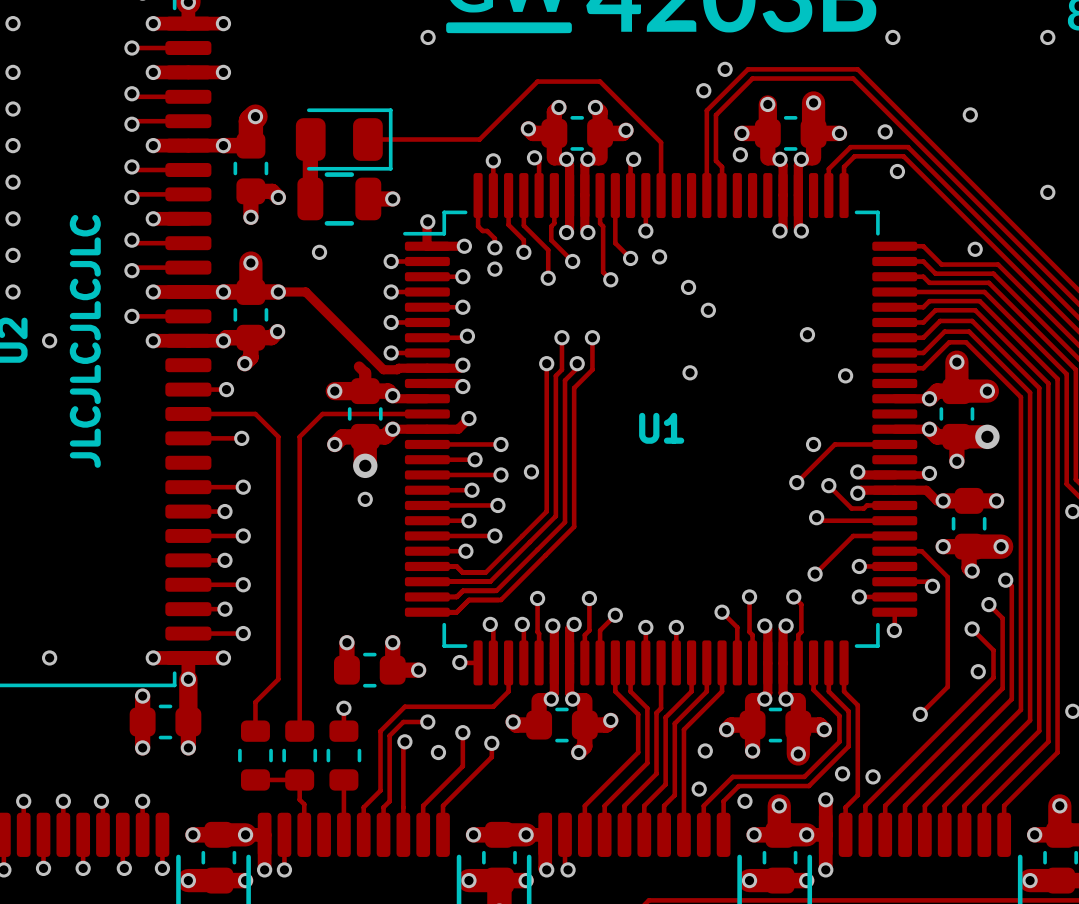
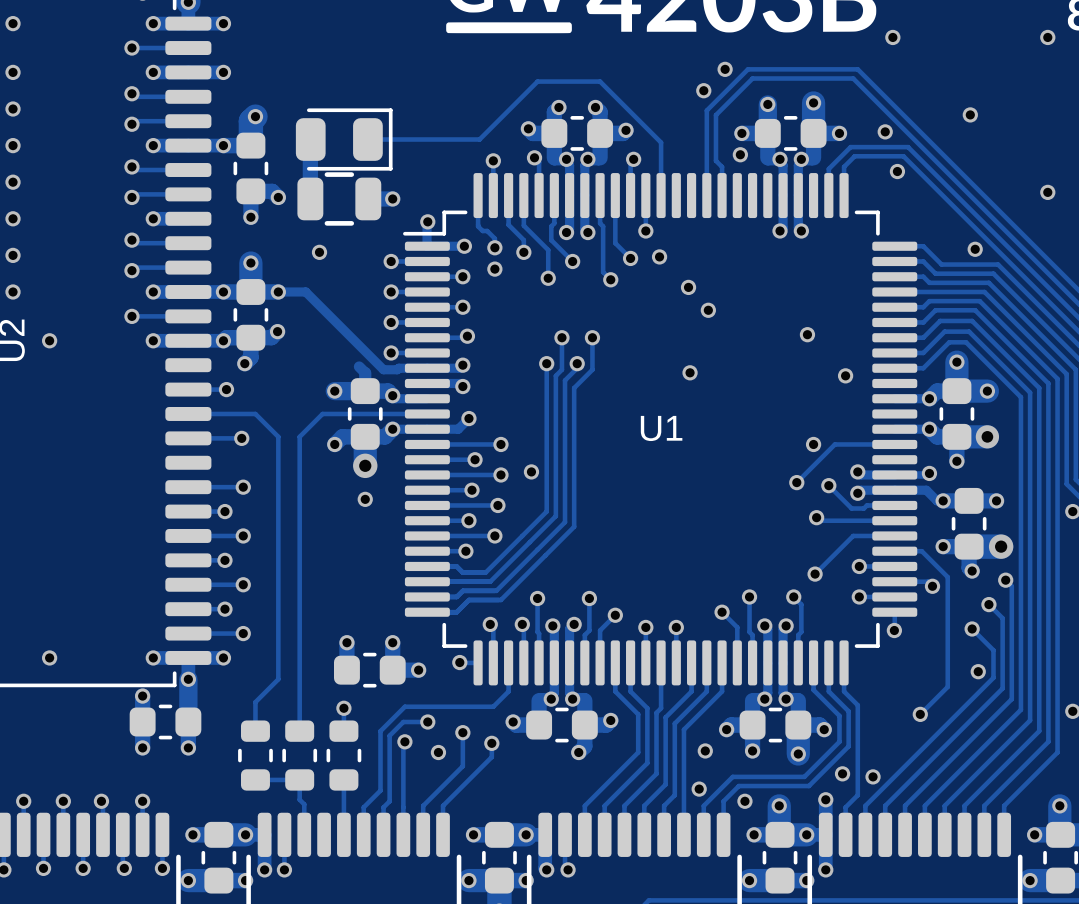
via: (428, 37) -> none
text: JLCJLCJLCJLC (85, 341) -> none
via position: (987, 436) -> (1001, 546)
via: none -> (987, 436)
via: (1001, 546) -> none

